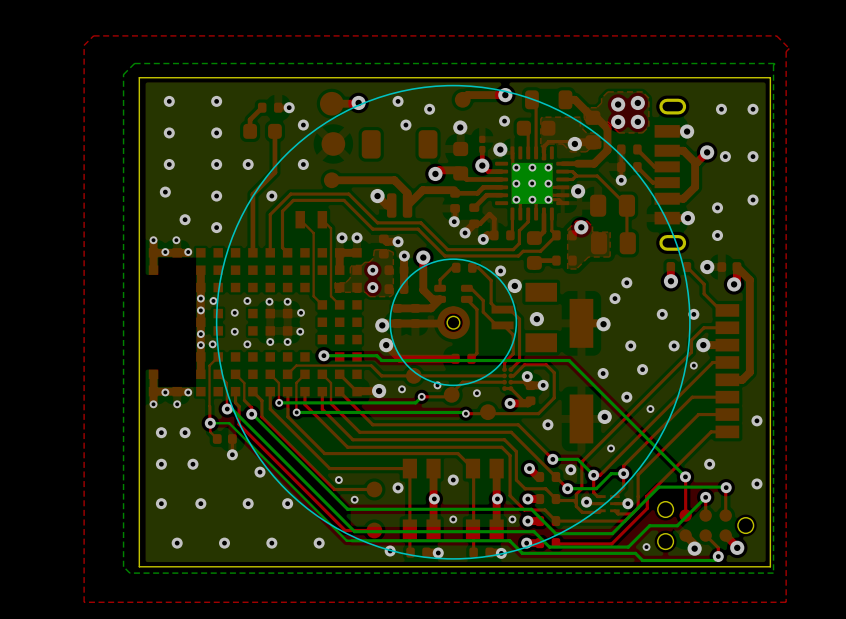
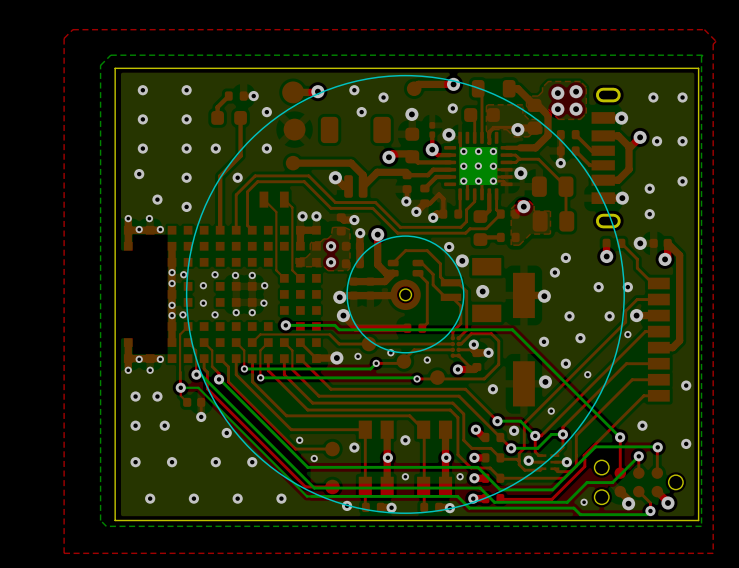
top track: (455, 264) (440, 279) (440, 288) -> none
part: (464, 267) -> none
top track: (472, 267) (478, 267) (491, 280) (491, 289) -> (393, 263) (405, 250) (427, 250) (440, 263)

